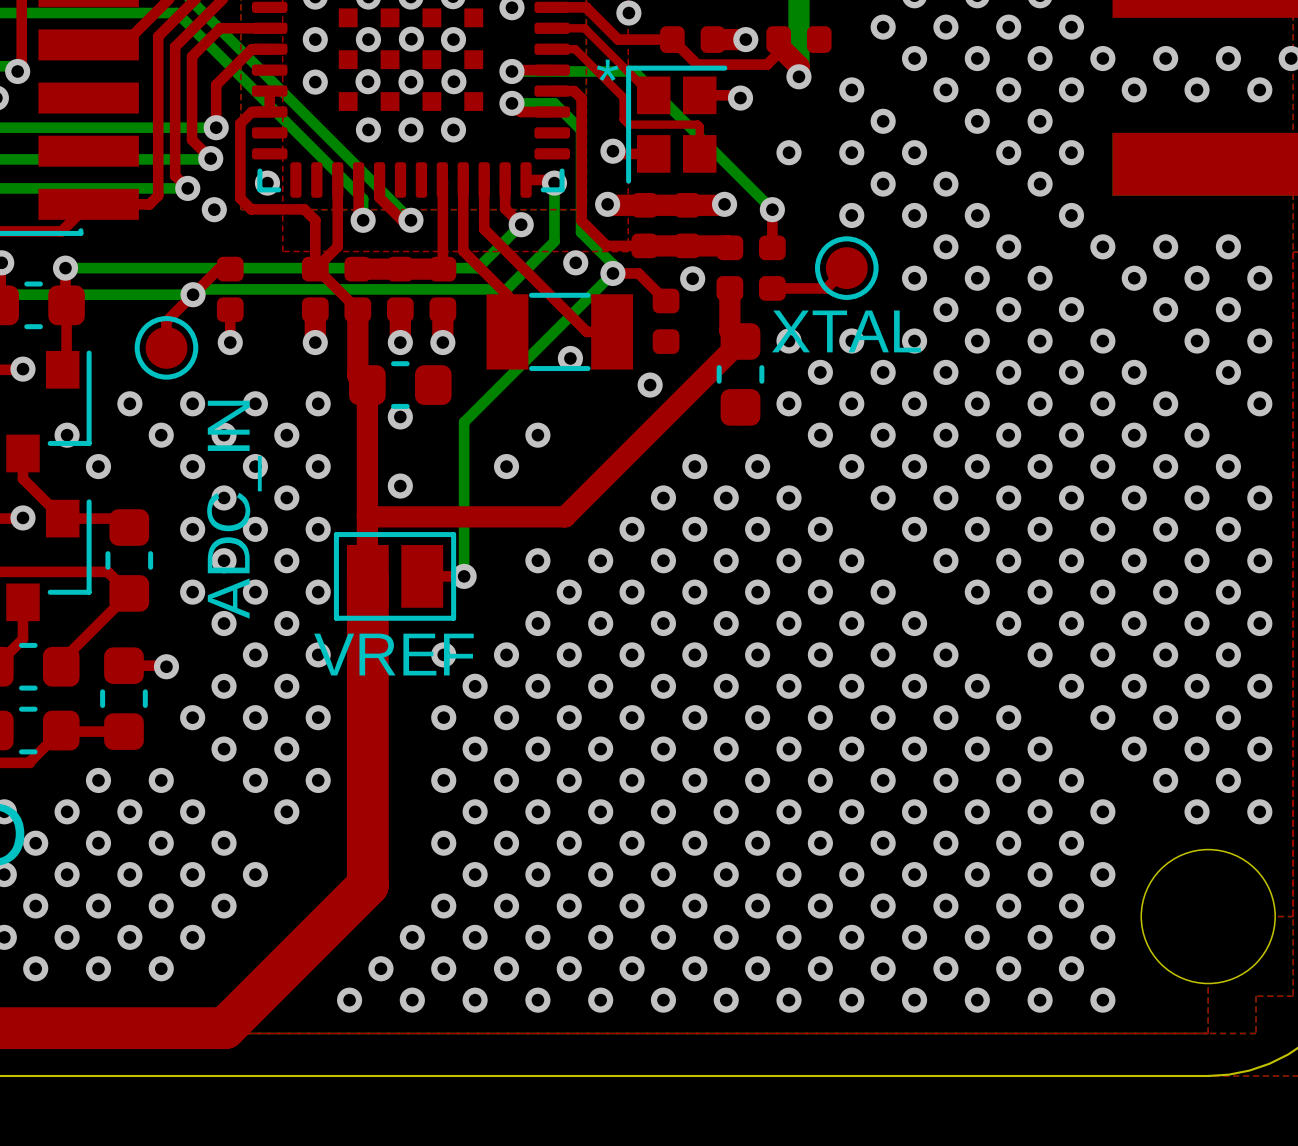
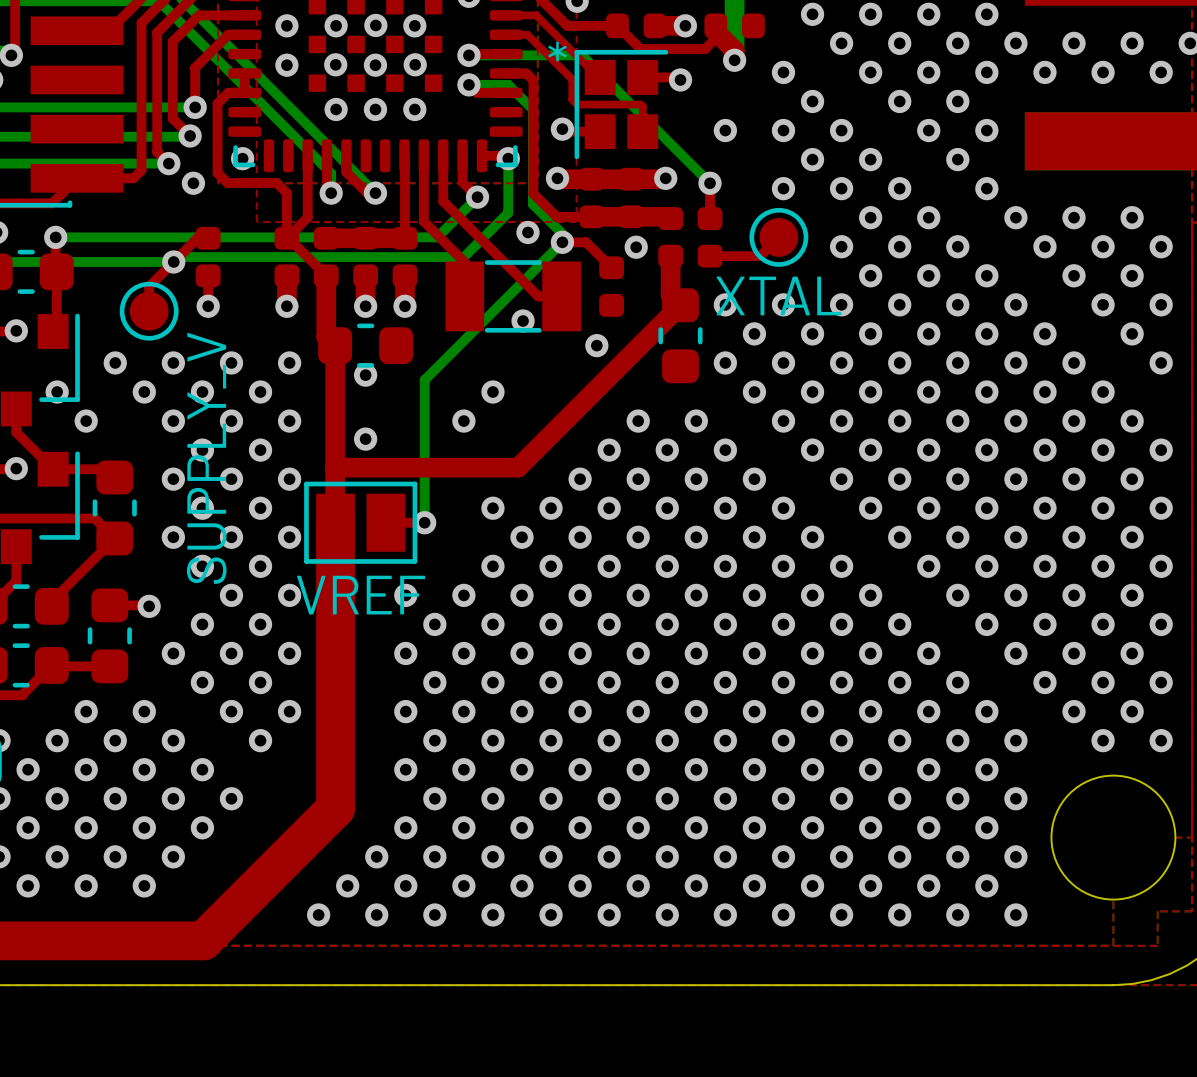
part value: ADC_IN (234, 509) -> SUPPLY_V (206, 458)

